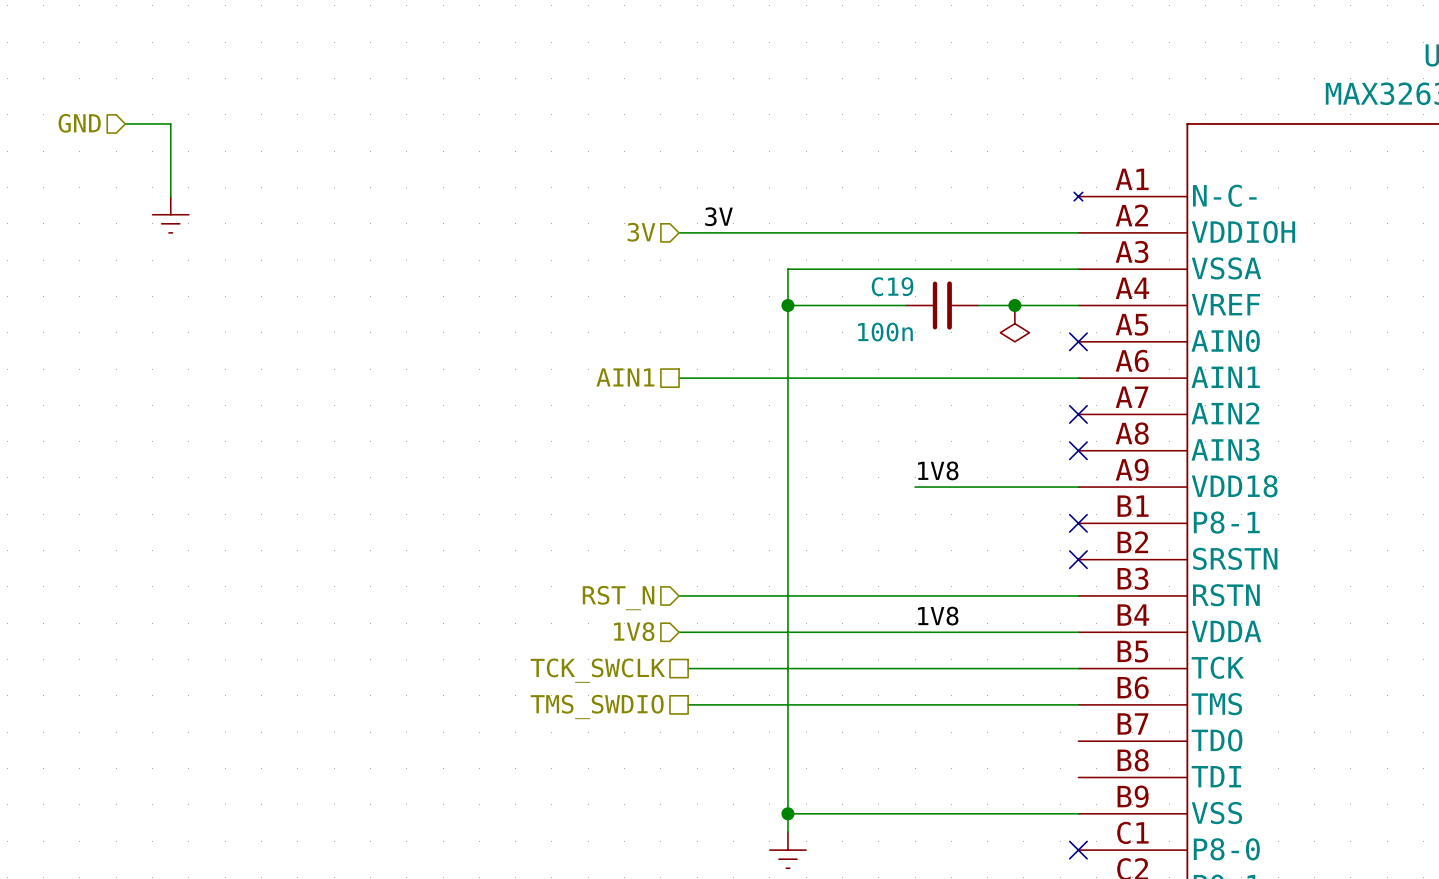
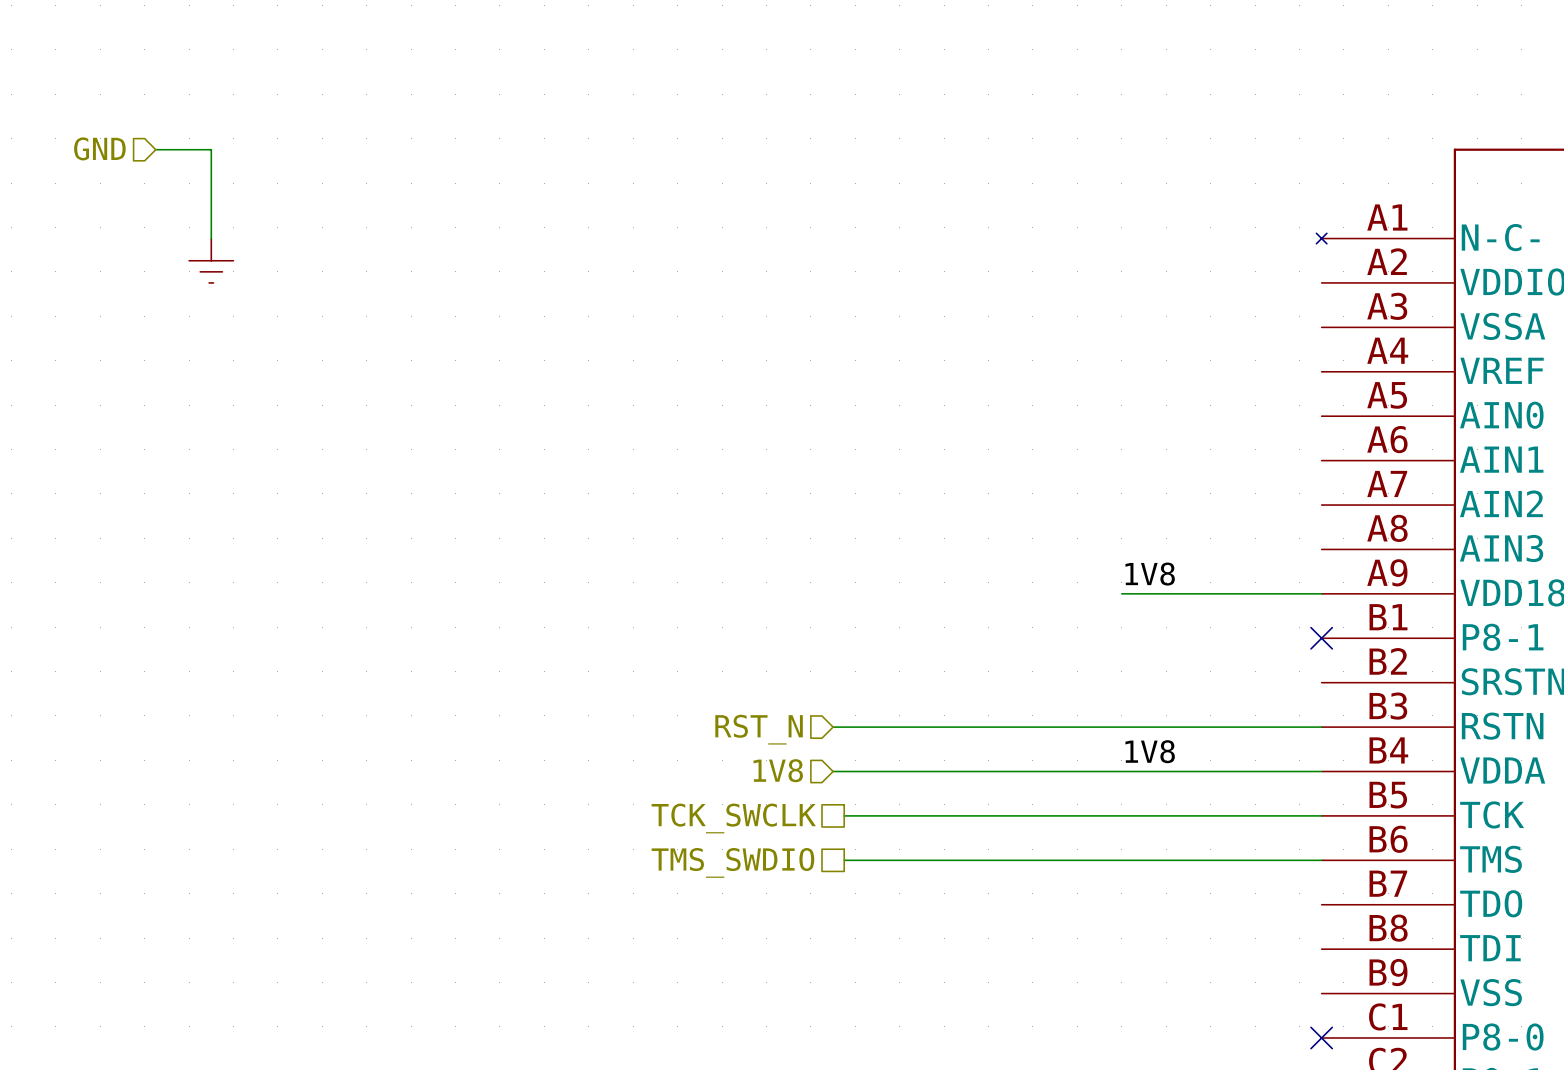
label: 3V (719, 216) -> none
hierarchical label: 3V (641, 232) -> none
wire: (679, 232) (1078, 232) -> none
wire: (1078, 269) (787, 269) (787, 831) -> none
wire: (787, 305) (905, 305) -> none
junction: (787, 305) -> none
C19: 100n (942, 305) -> none
wire: (978, 305) (1078, 305) -> none
junction: (1014, 305) -> none
power symbol: (1014, 323) -> none
no-connect mark: (1078, 341) -> none
hierarchical label: AIN1 (625, 377) -> none
wire: (679, 378) (1078, 378) -> none
no-connect mark: (1078, 414) -> none
no-connect mark: (1078, 450) -> none
no-connect mark: (1078, 559) -> none
wire: (787, 813) (1078, 813) -> none
junction: (787, 813) -> none
power symbol: (787, 850) -> none

